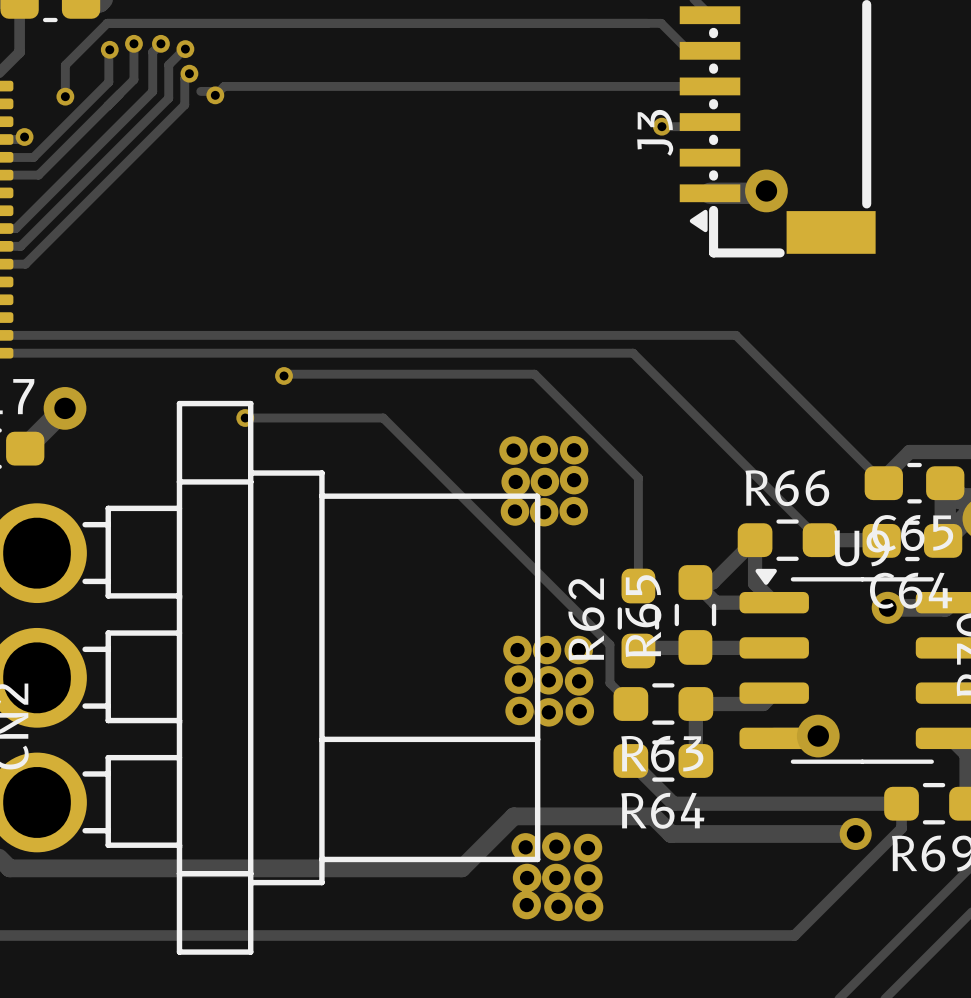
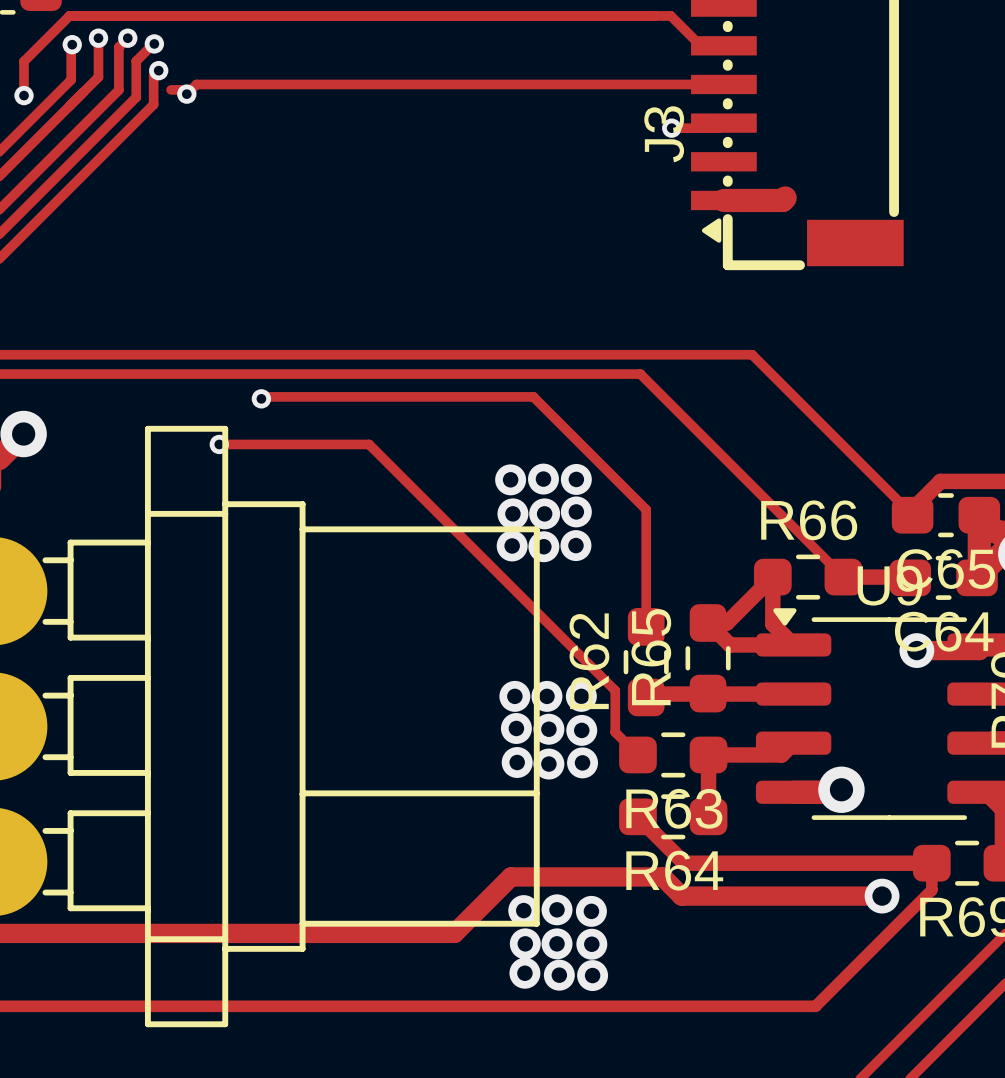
via: (766, 190) -> none

